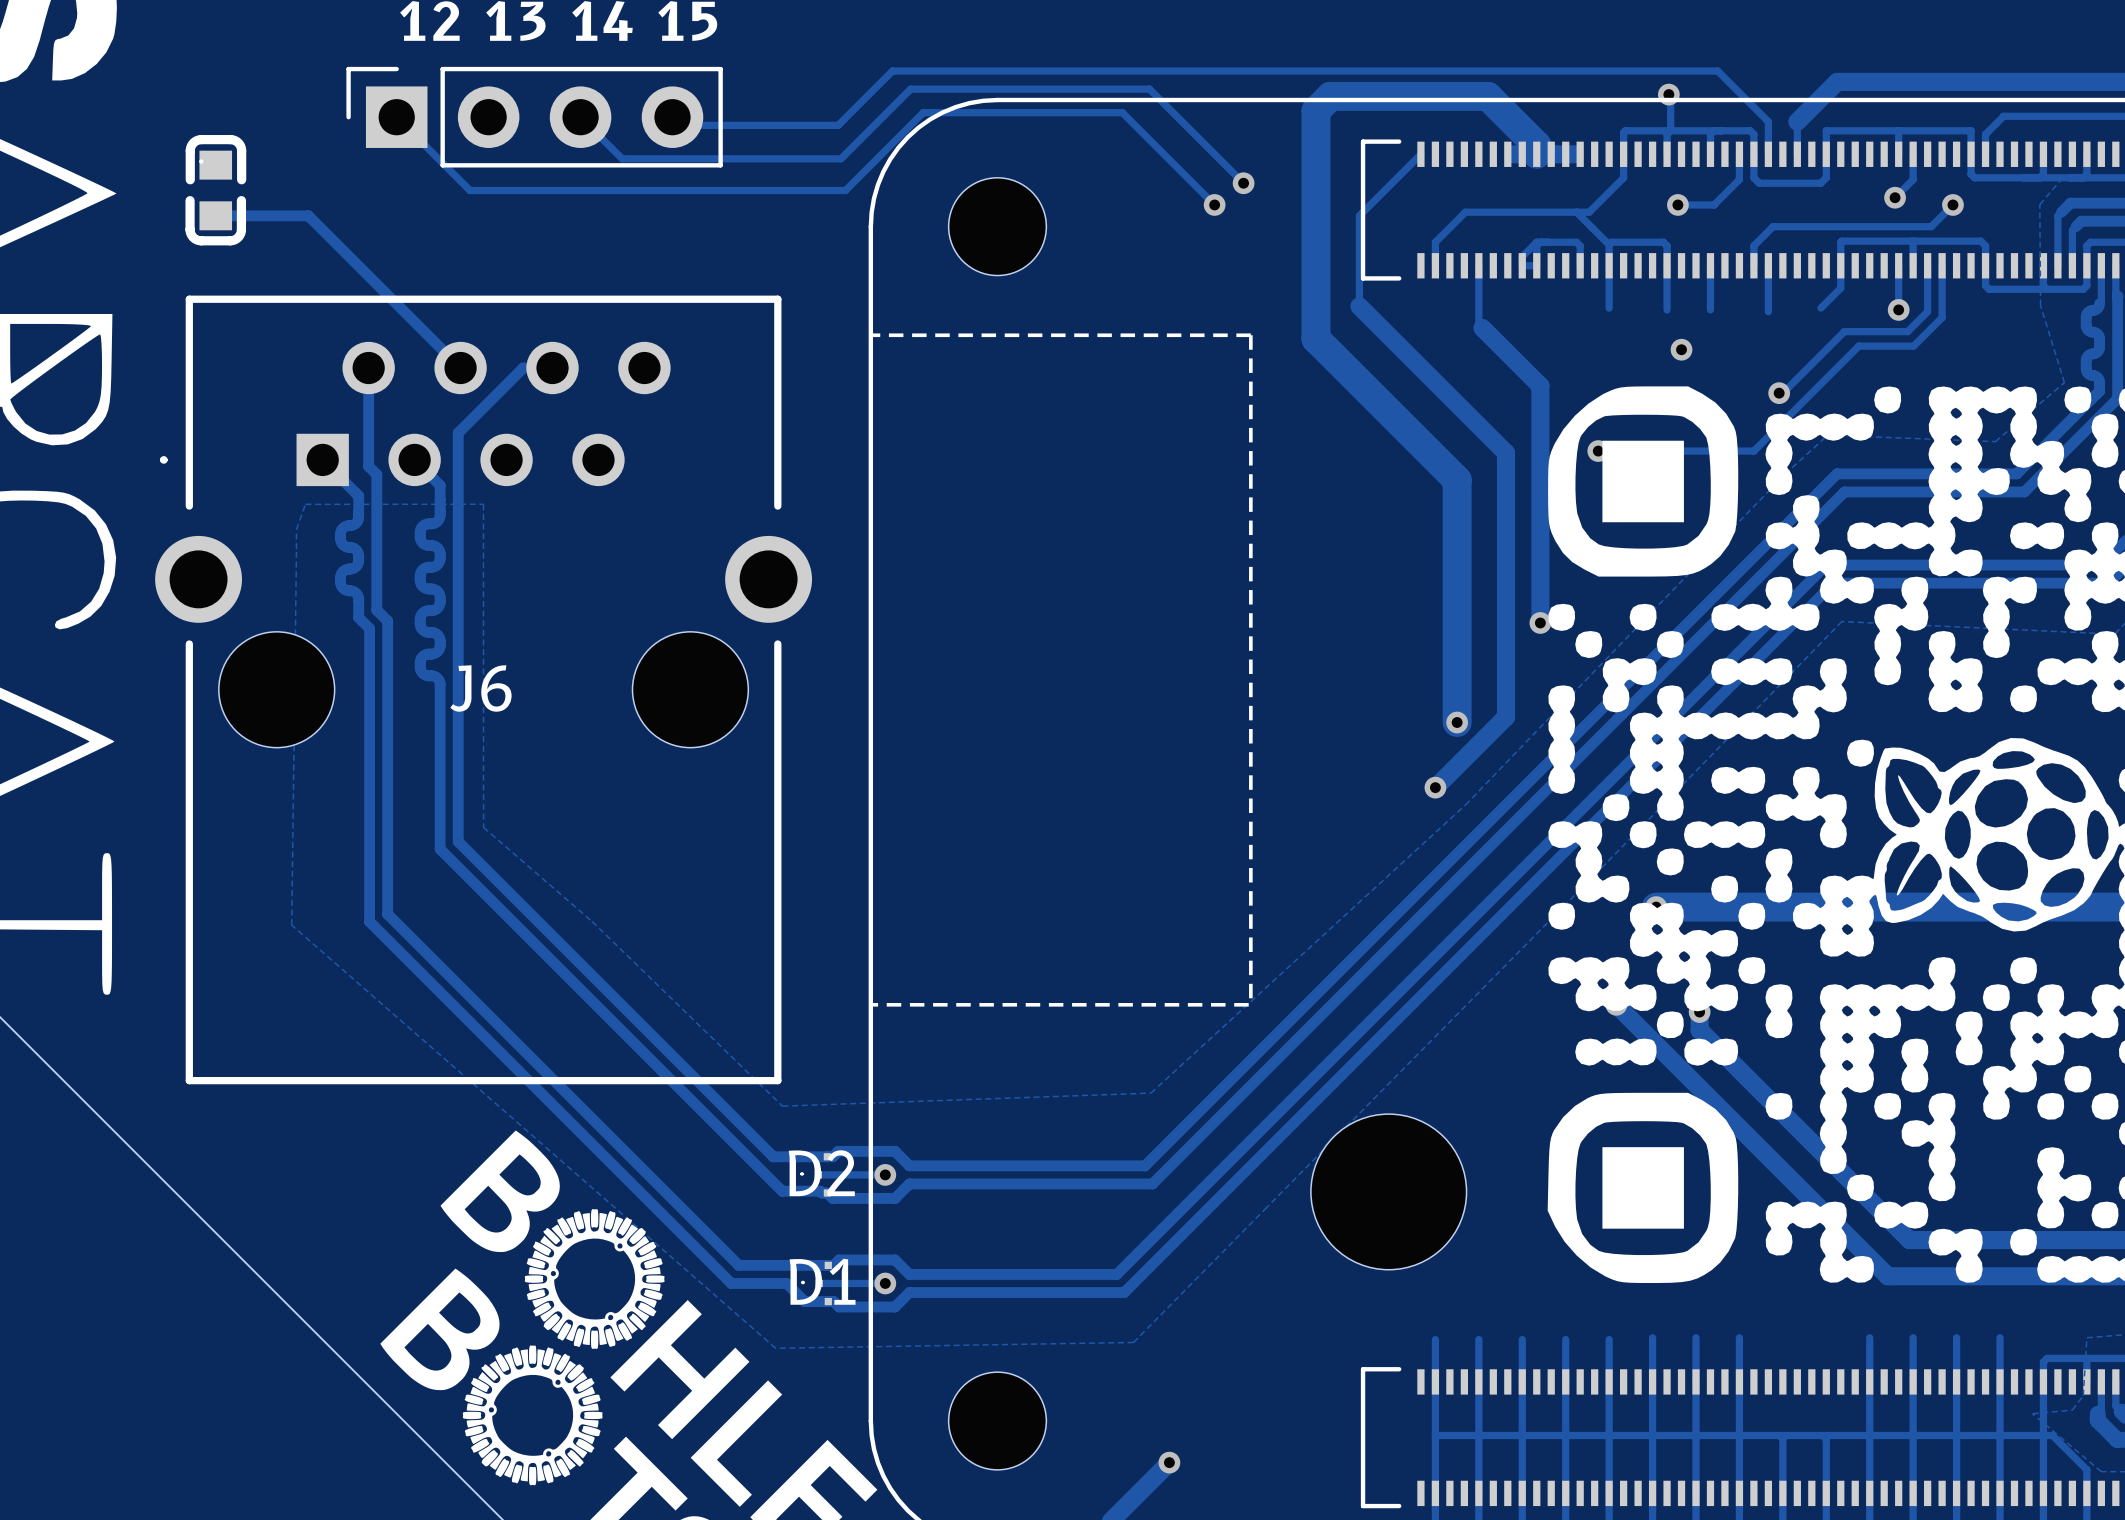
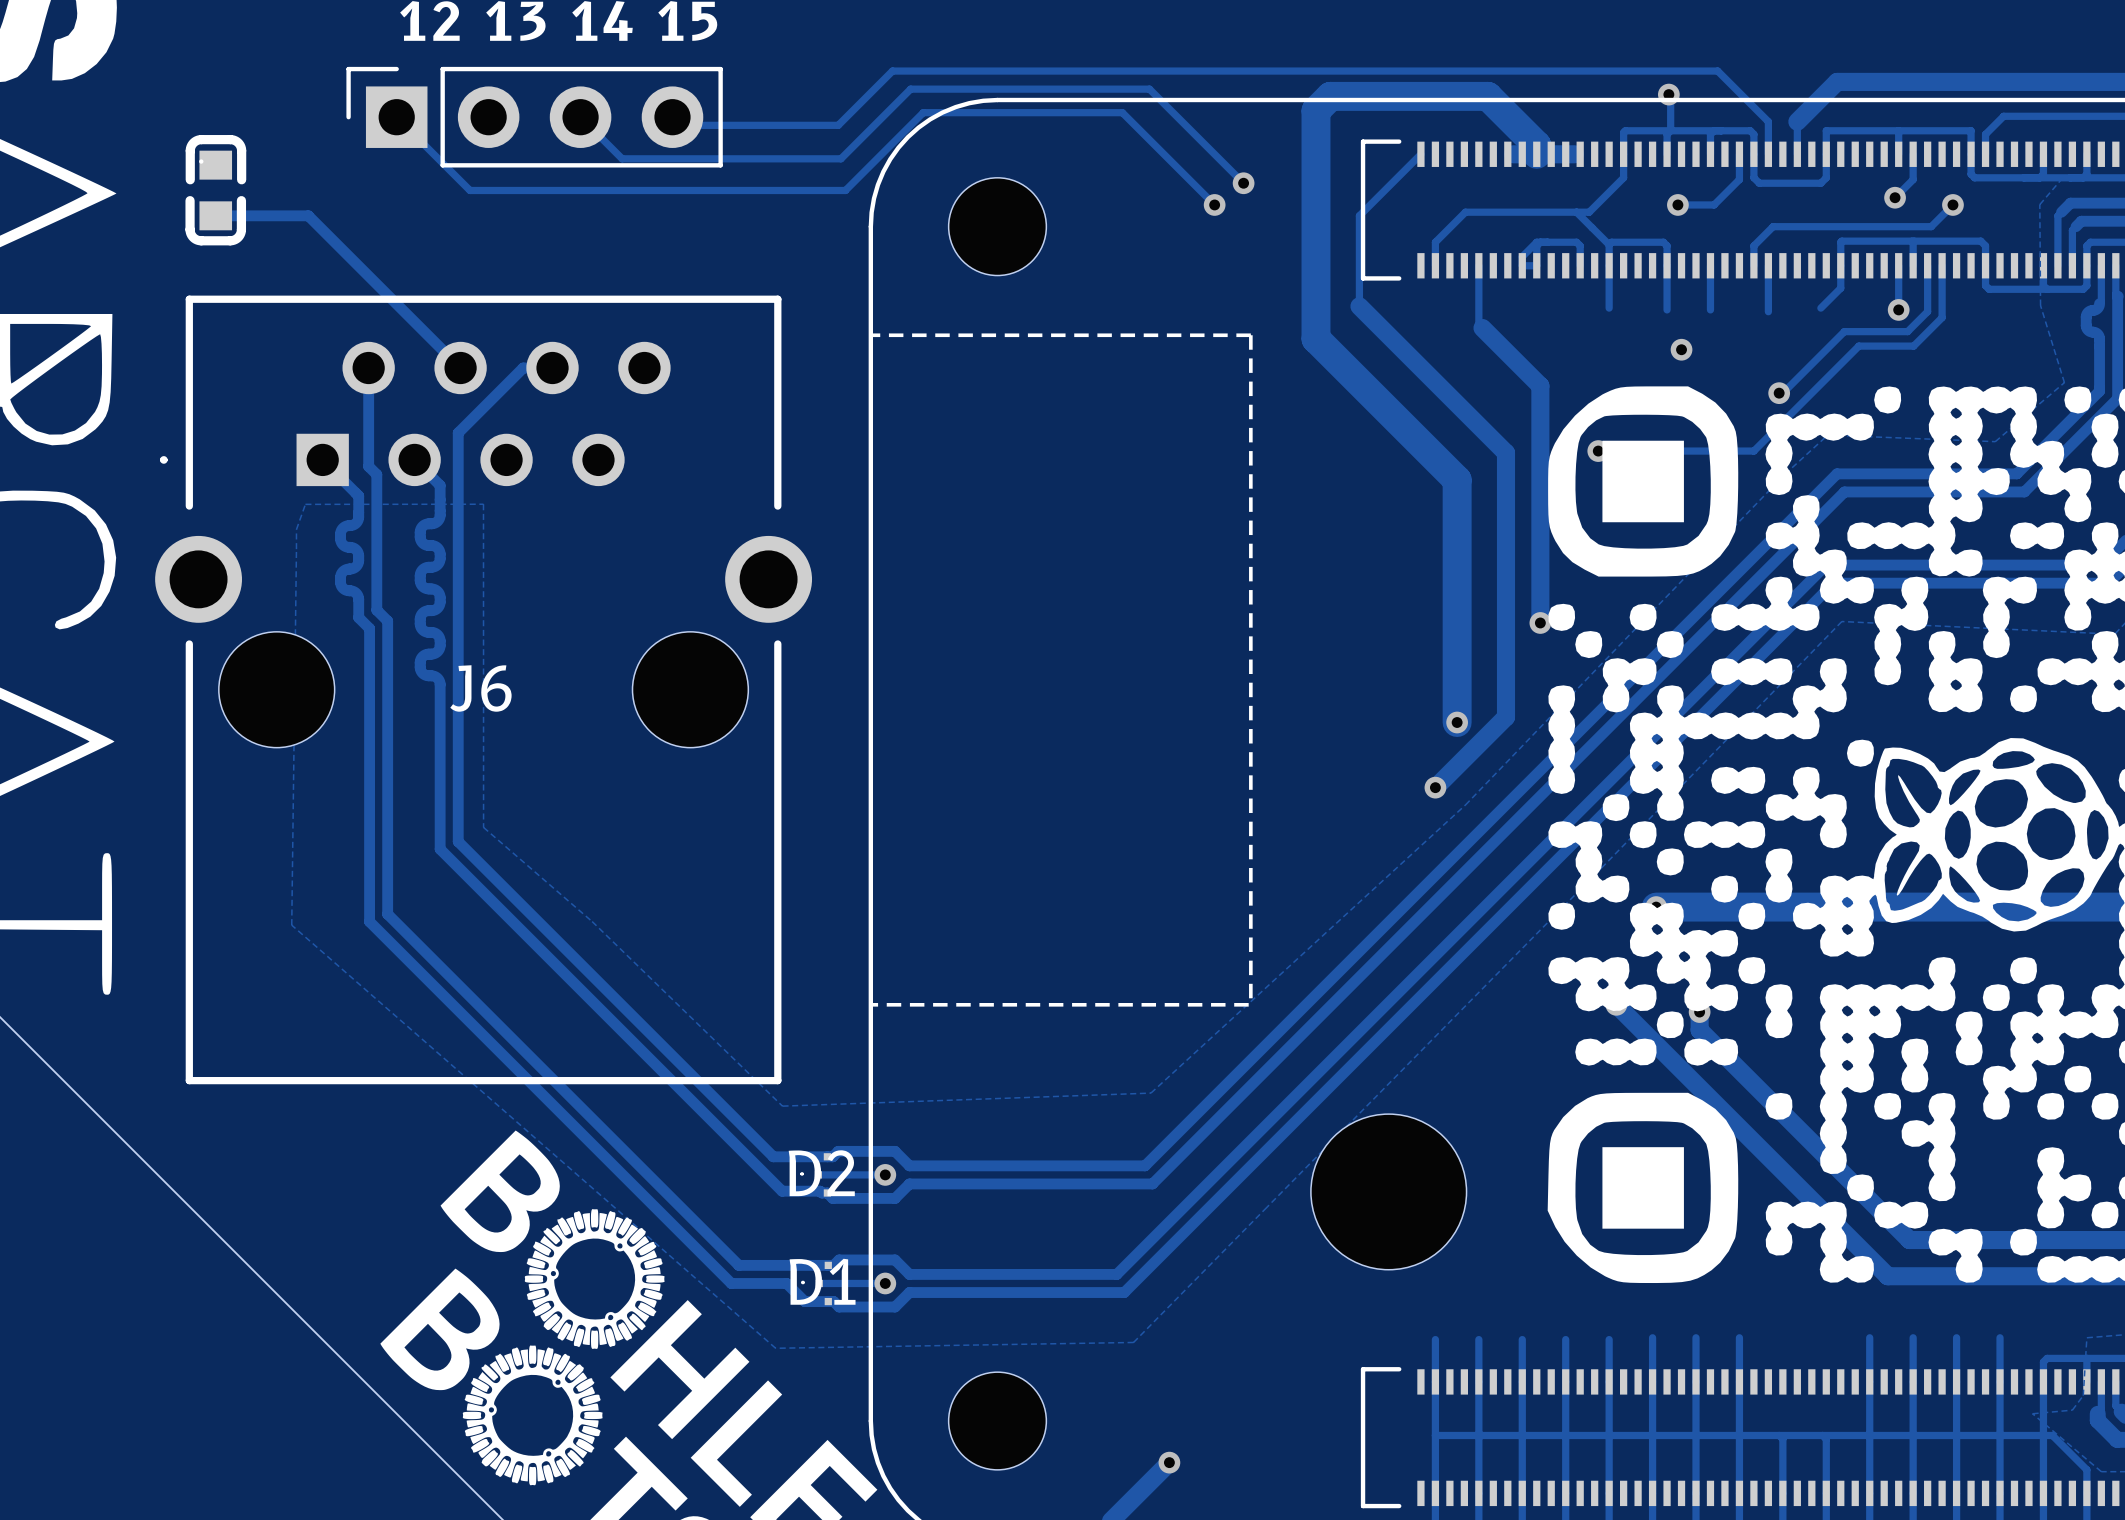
track: (2099, 347) (2097, 351) (2088, 355) (2086, 360) (2087, 372) (2096, 376) (2099, 382) -> (2099, 347) (2099, 382)

